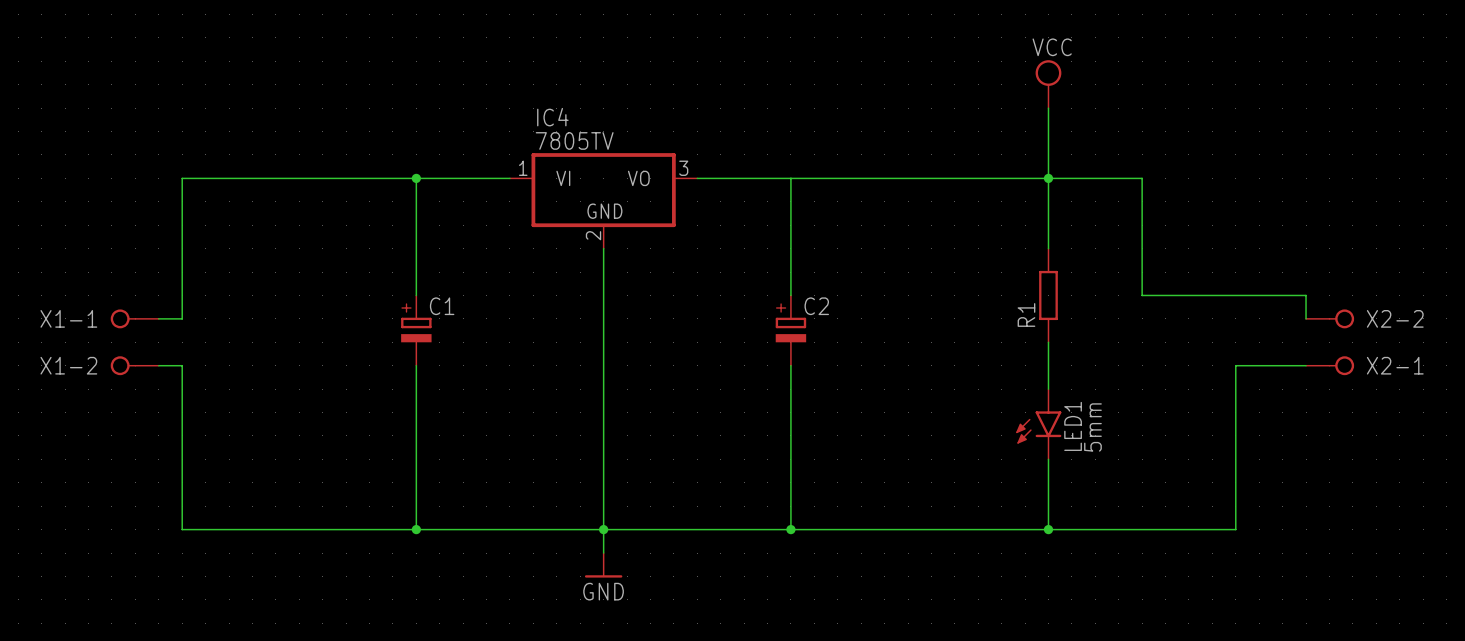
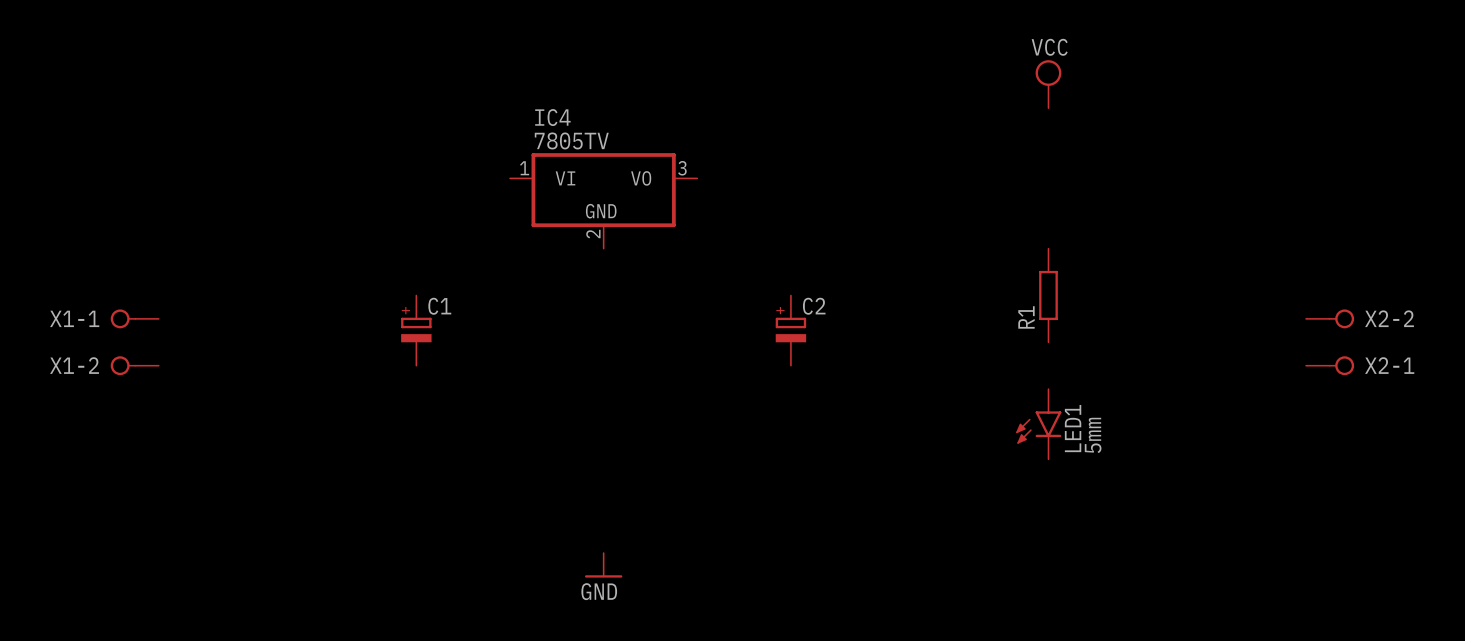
wire: (1048, 108) (1048, 248) -> none
wire: (416, 178) (416, 295) -> none
junction: (416, 178) -> none
wire: (509, 178) (182, 178) (182, 318) (158, 318) -> none
wire: (697, 178) (1142, 178) (1142, 295) (1306, 295) (1306, 318) -> none
wire: (790, 178) (790, 295) -> none
junction: (1048, 178) -> none
wire: (603, 248) (603, 553) -> none
wire: (1048, 342) (1048, 389) -> none
wire: (158, 365) (182, 365) (182, 529) (1235, 529) (1235, 365) (1306, 365) -> none
wire: (416, 365) (416, 529) -> none
wire: (790, 365) (790, 529) -> none
wire: (1048, 459) (1048, 529) -> none
junction: (416, 529) -> none
junction: (603, 529) -> none
junction: (790, 529) -> none
junction: (1048, 529) -> none

